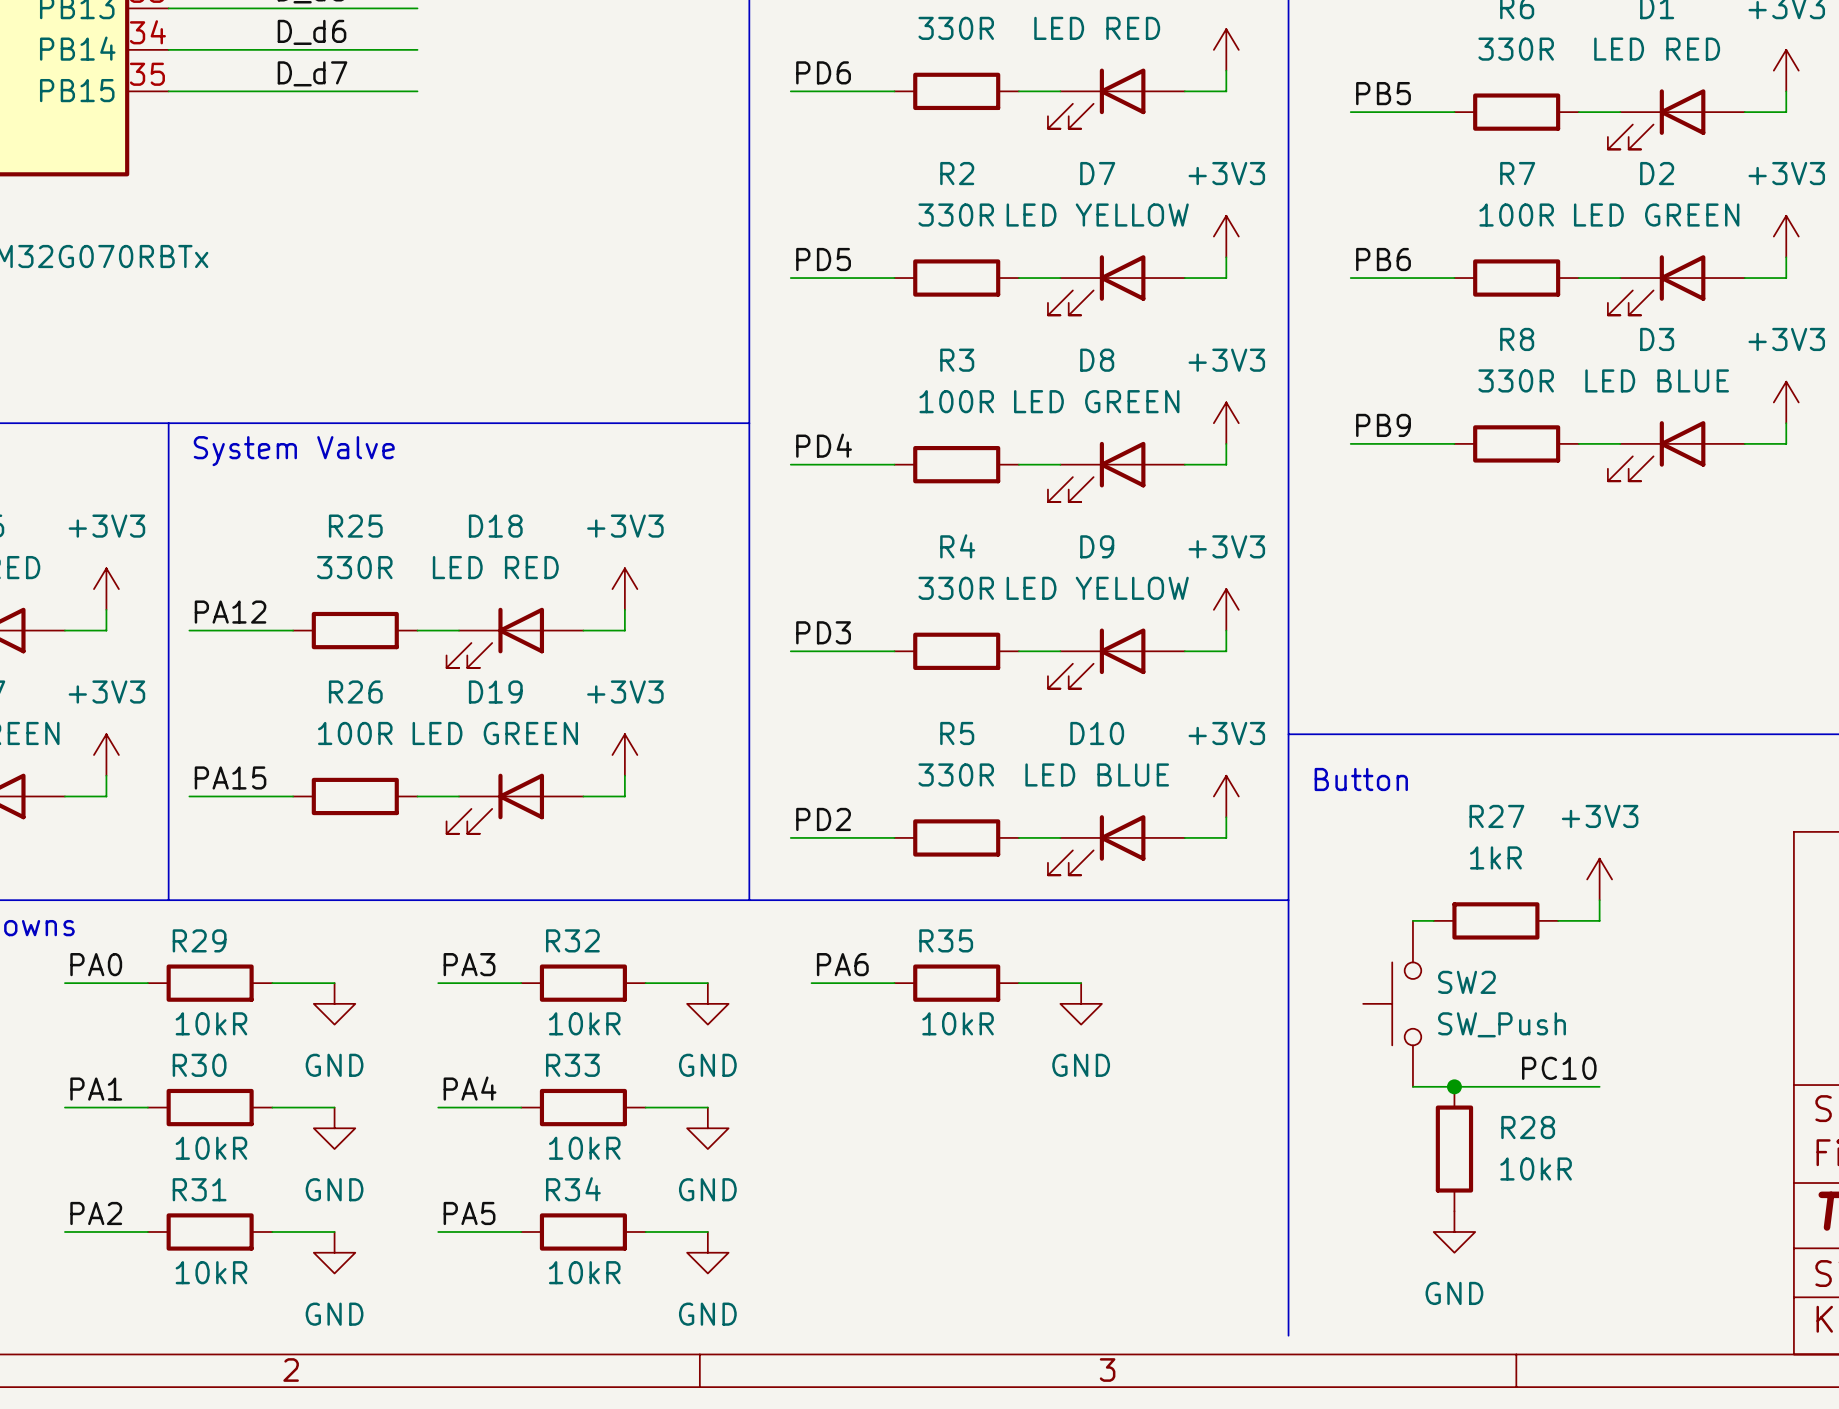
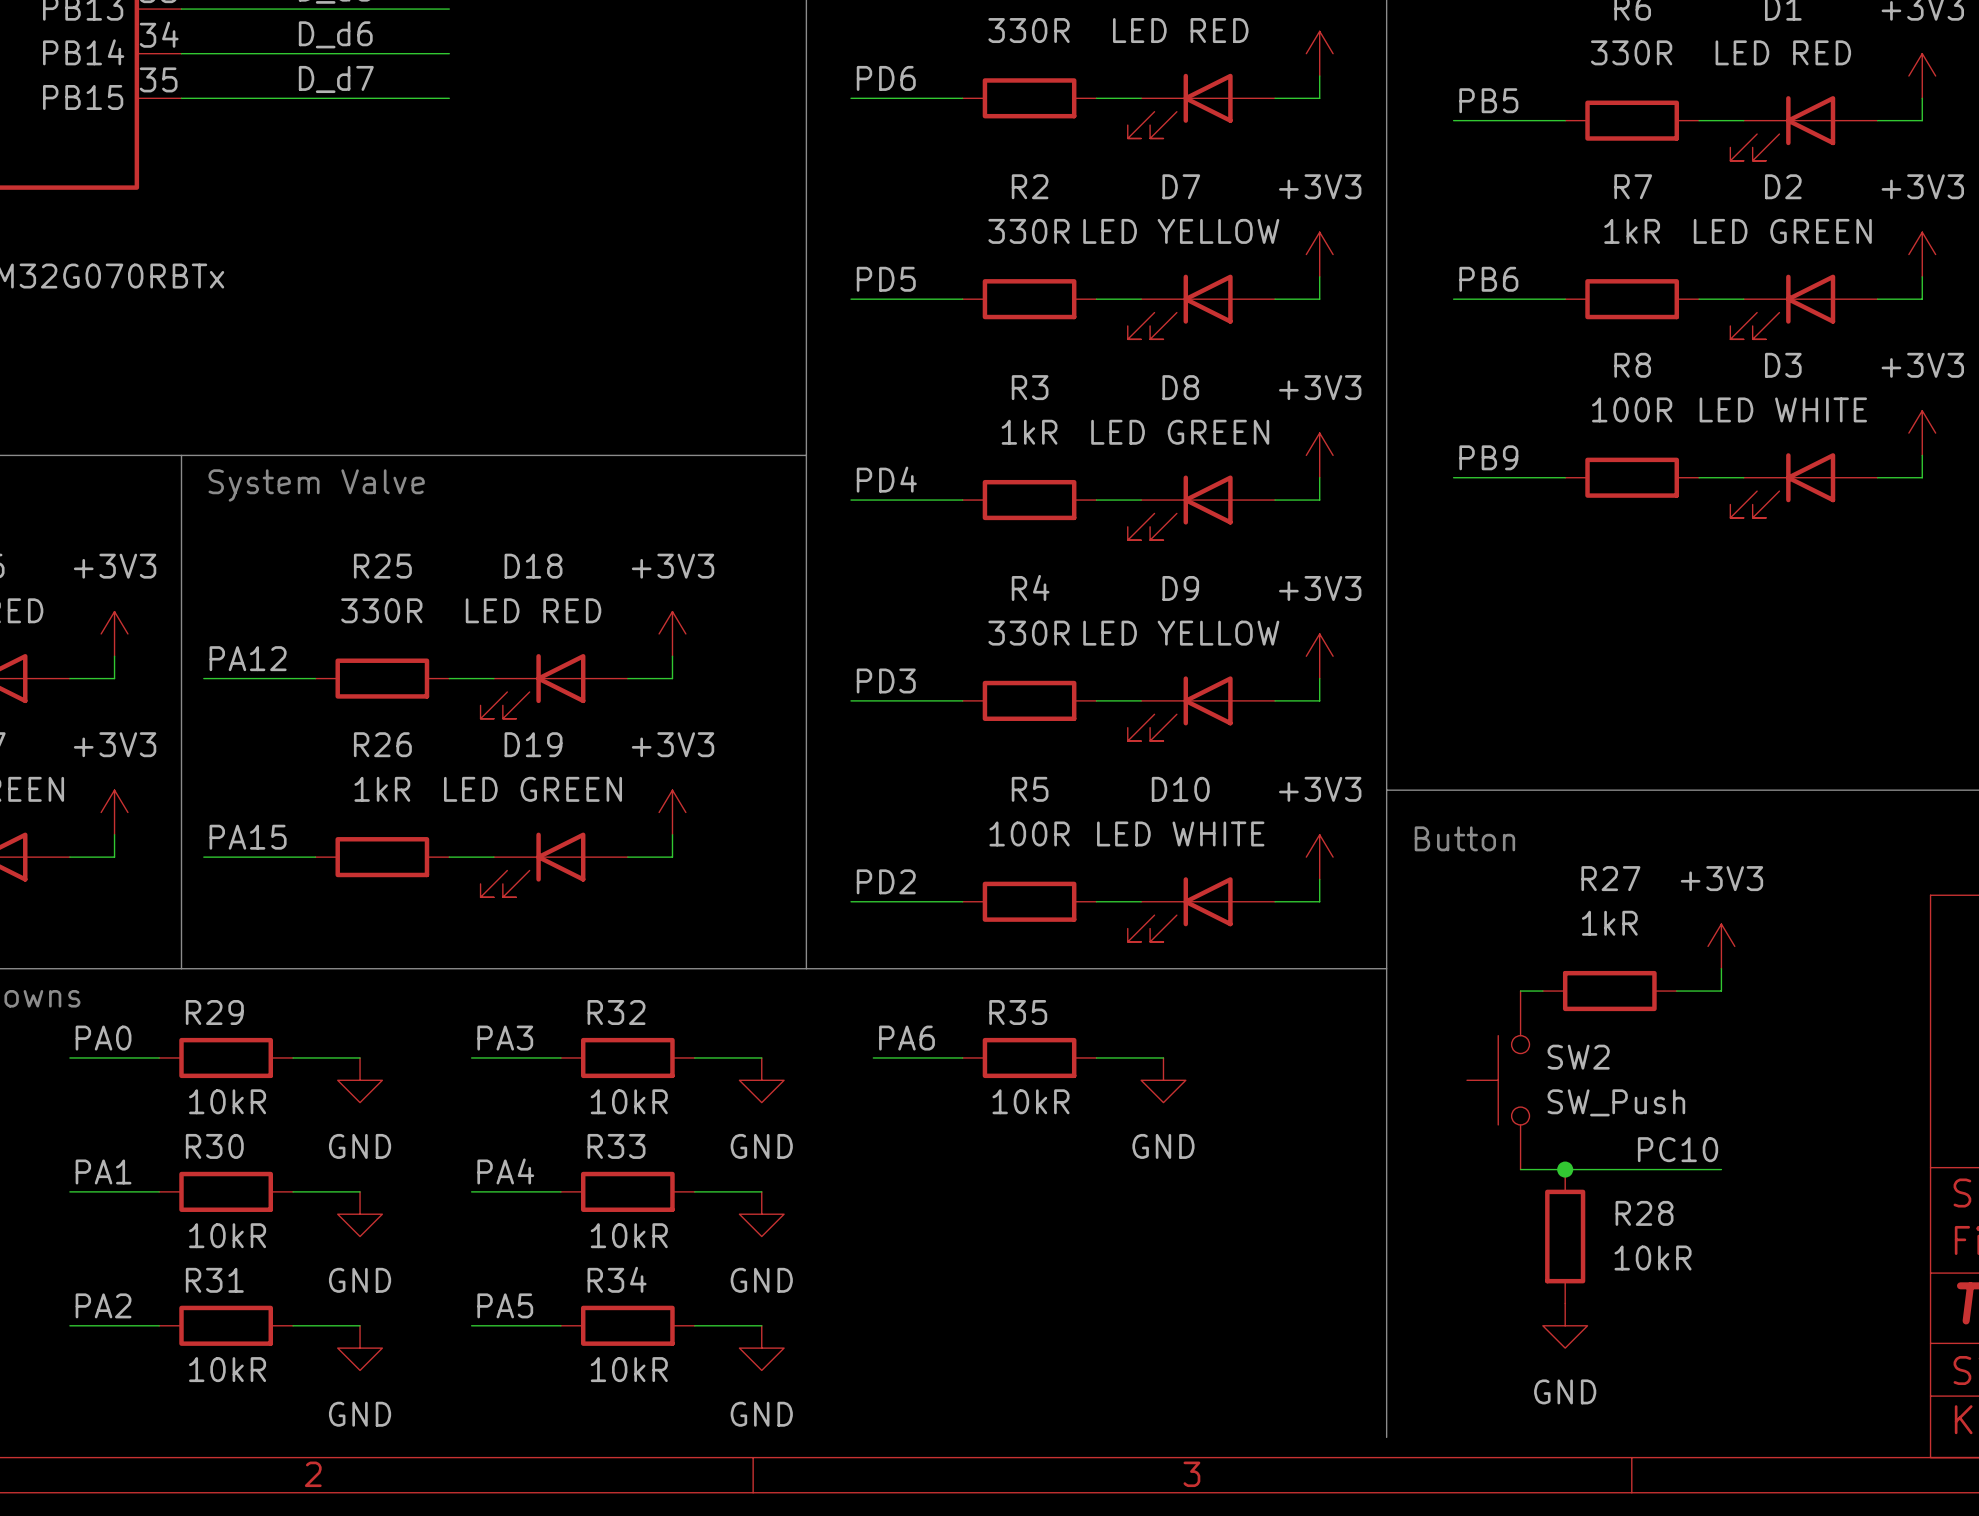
R7 value: 100R (1516, 215) -> 1kR (1632, 231)
R8 value: 330R (1516, 380) -> 100R (1632, 409)
D3 value: LED BLUE (1657, 380) -> LED WHITE (1783, 409)
R3 value: 100R (956, 401) -> 1kR (1029, 432)
R26 value: 100R (355, 733) -> 1kR (382, 789)
R5 value: 330R (956, 774) -> 100R (1029, 833)
D10 value: LED BLUE (1097, 774) -> LED WHITE (1180, 833)

